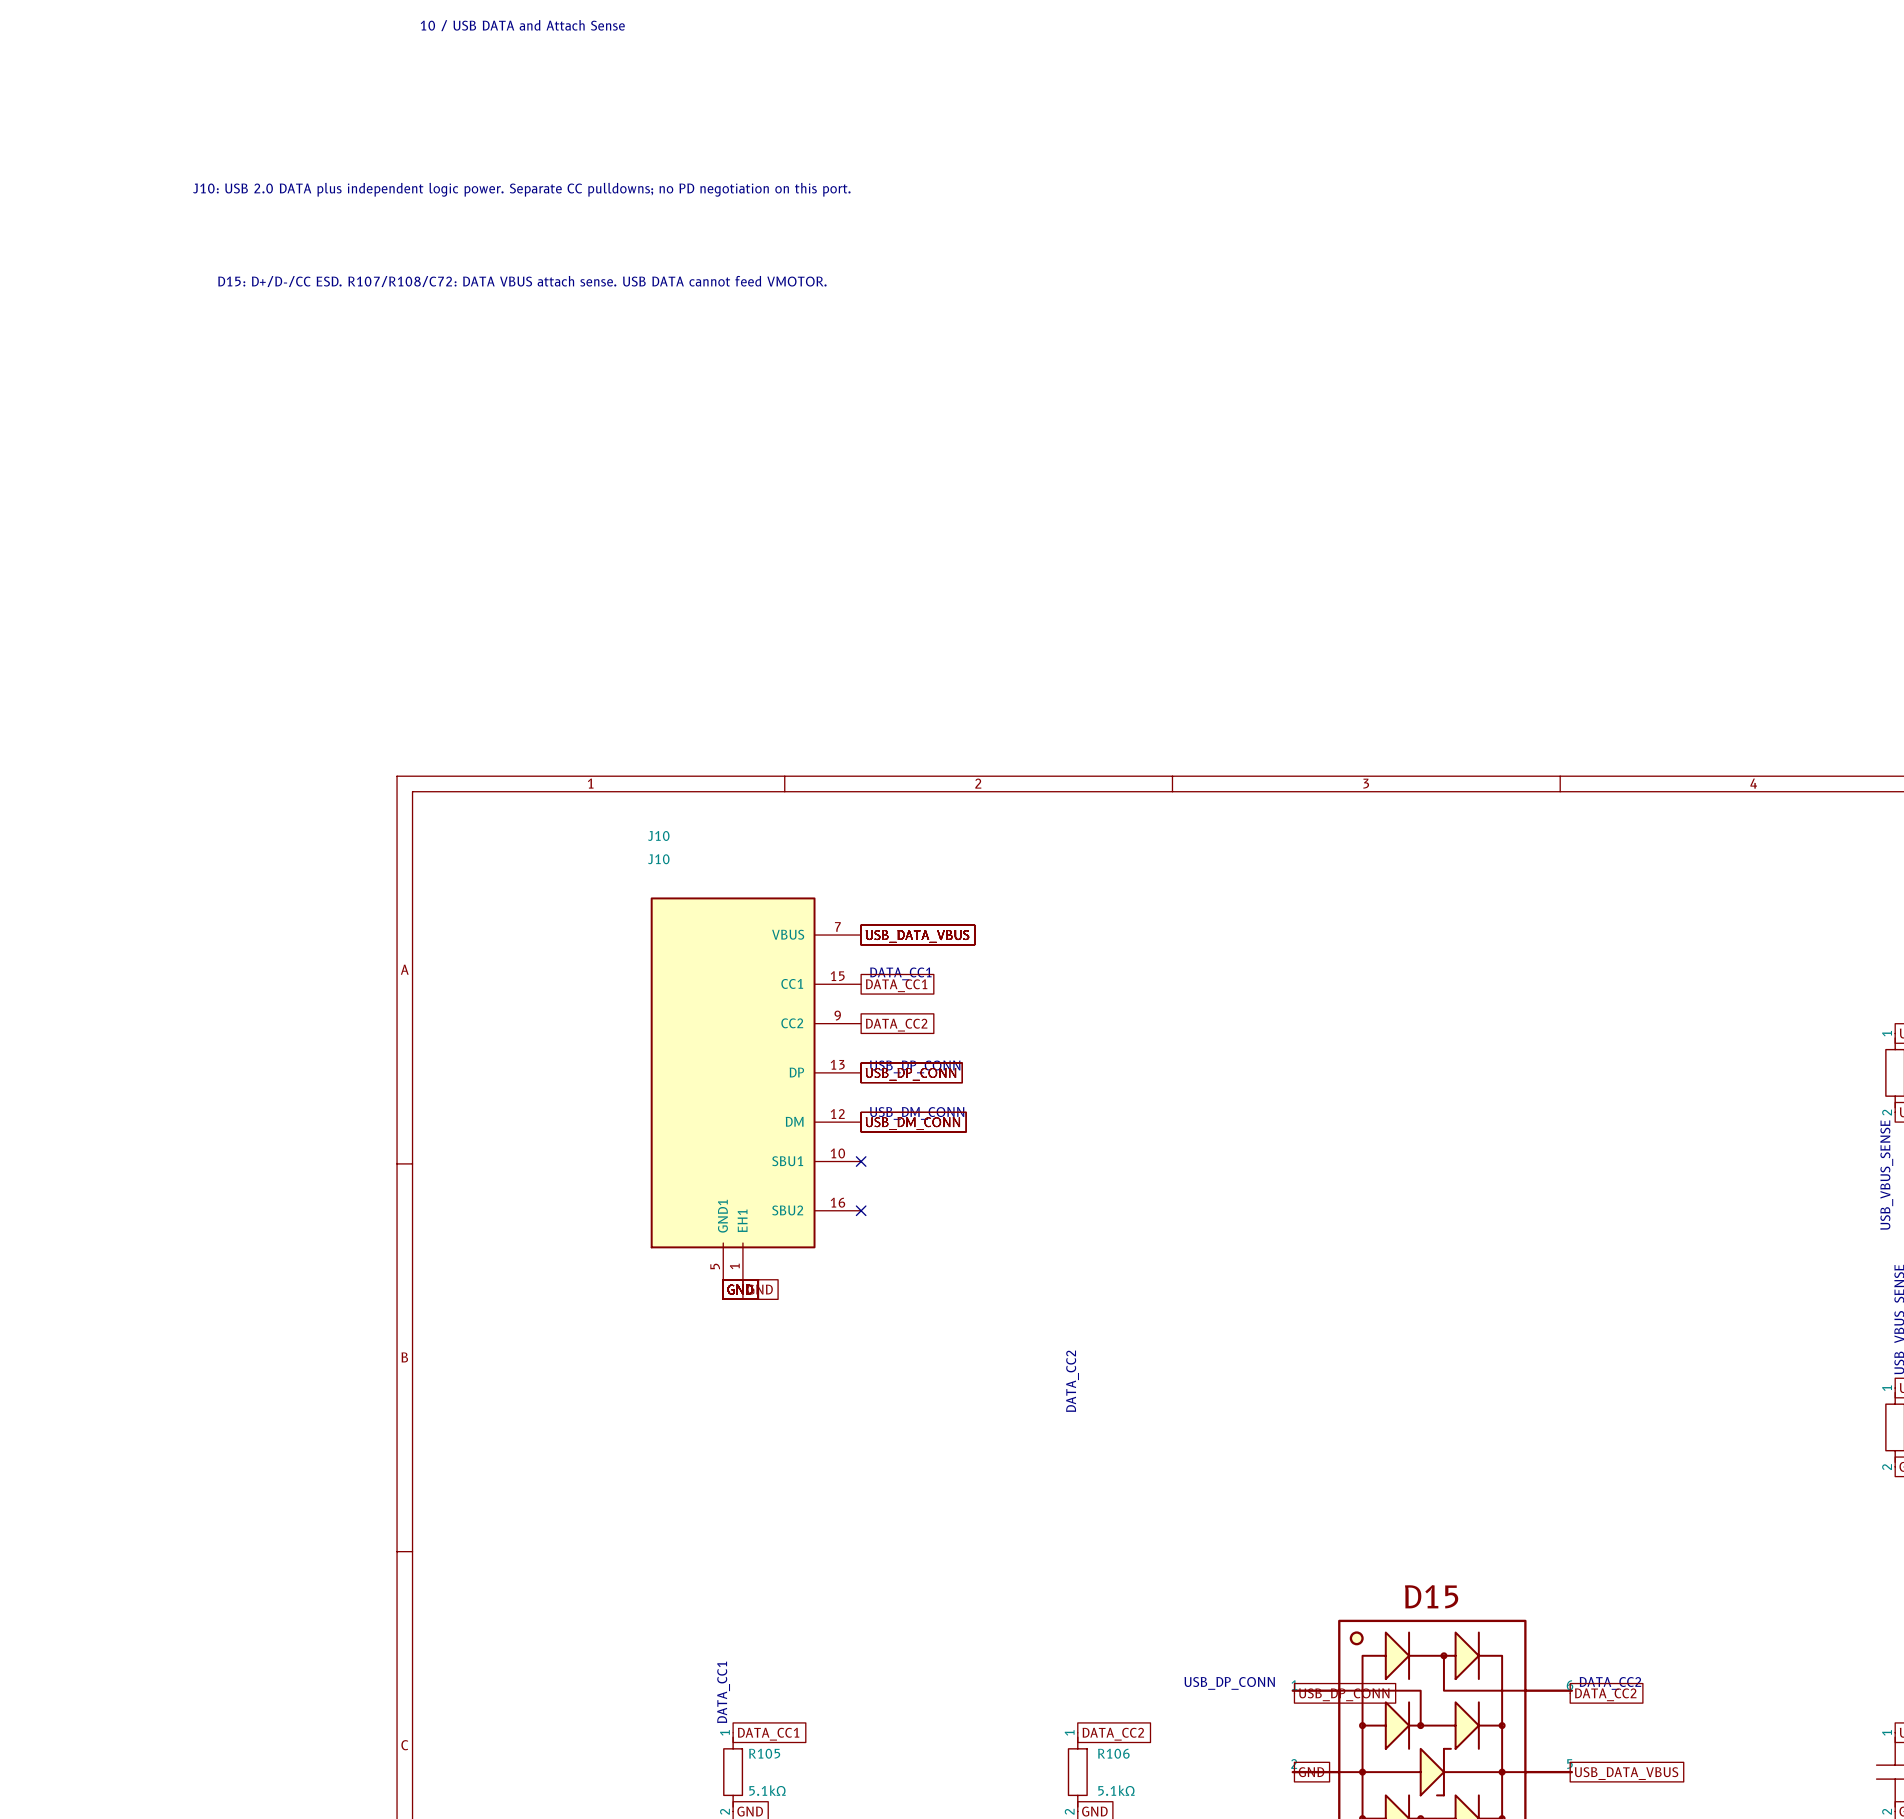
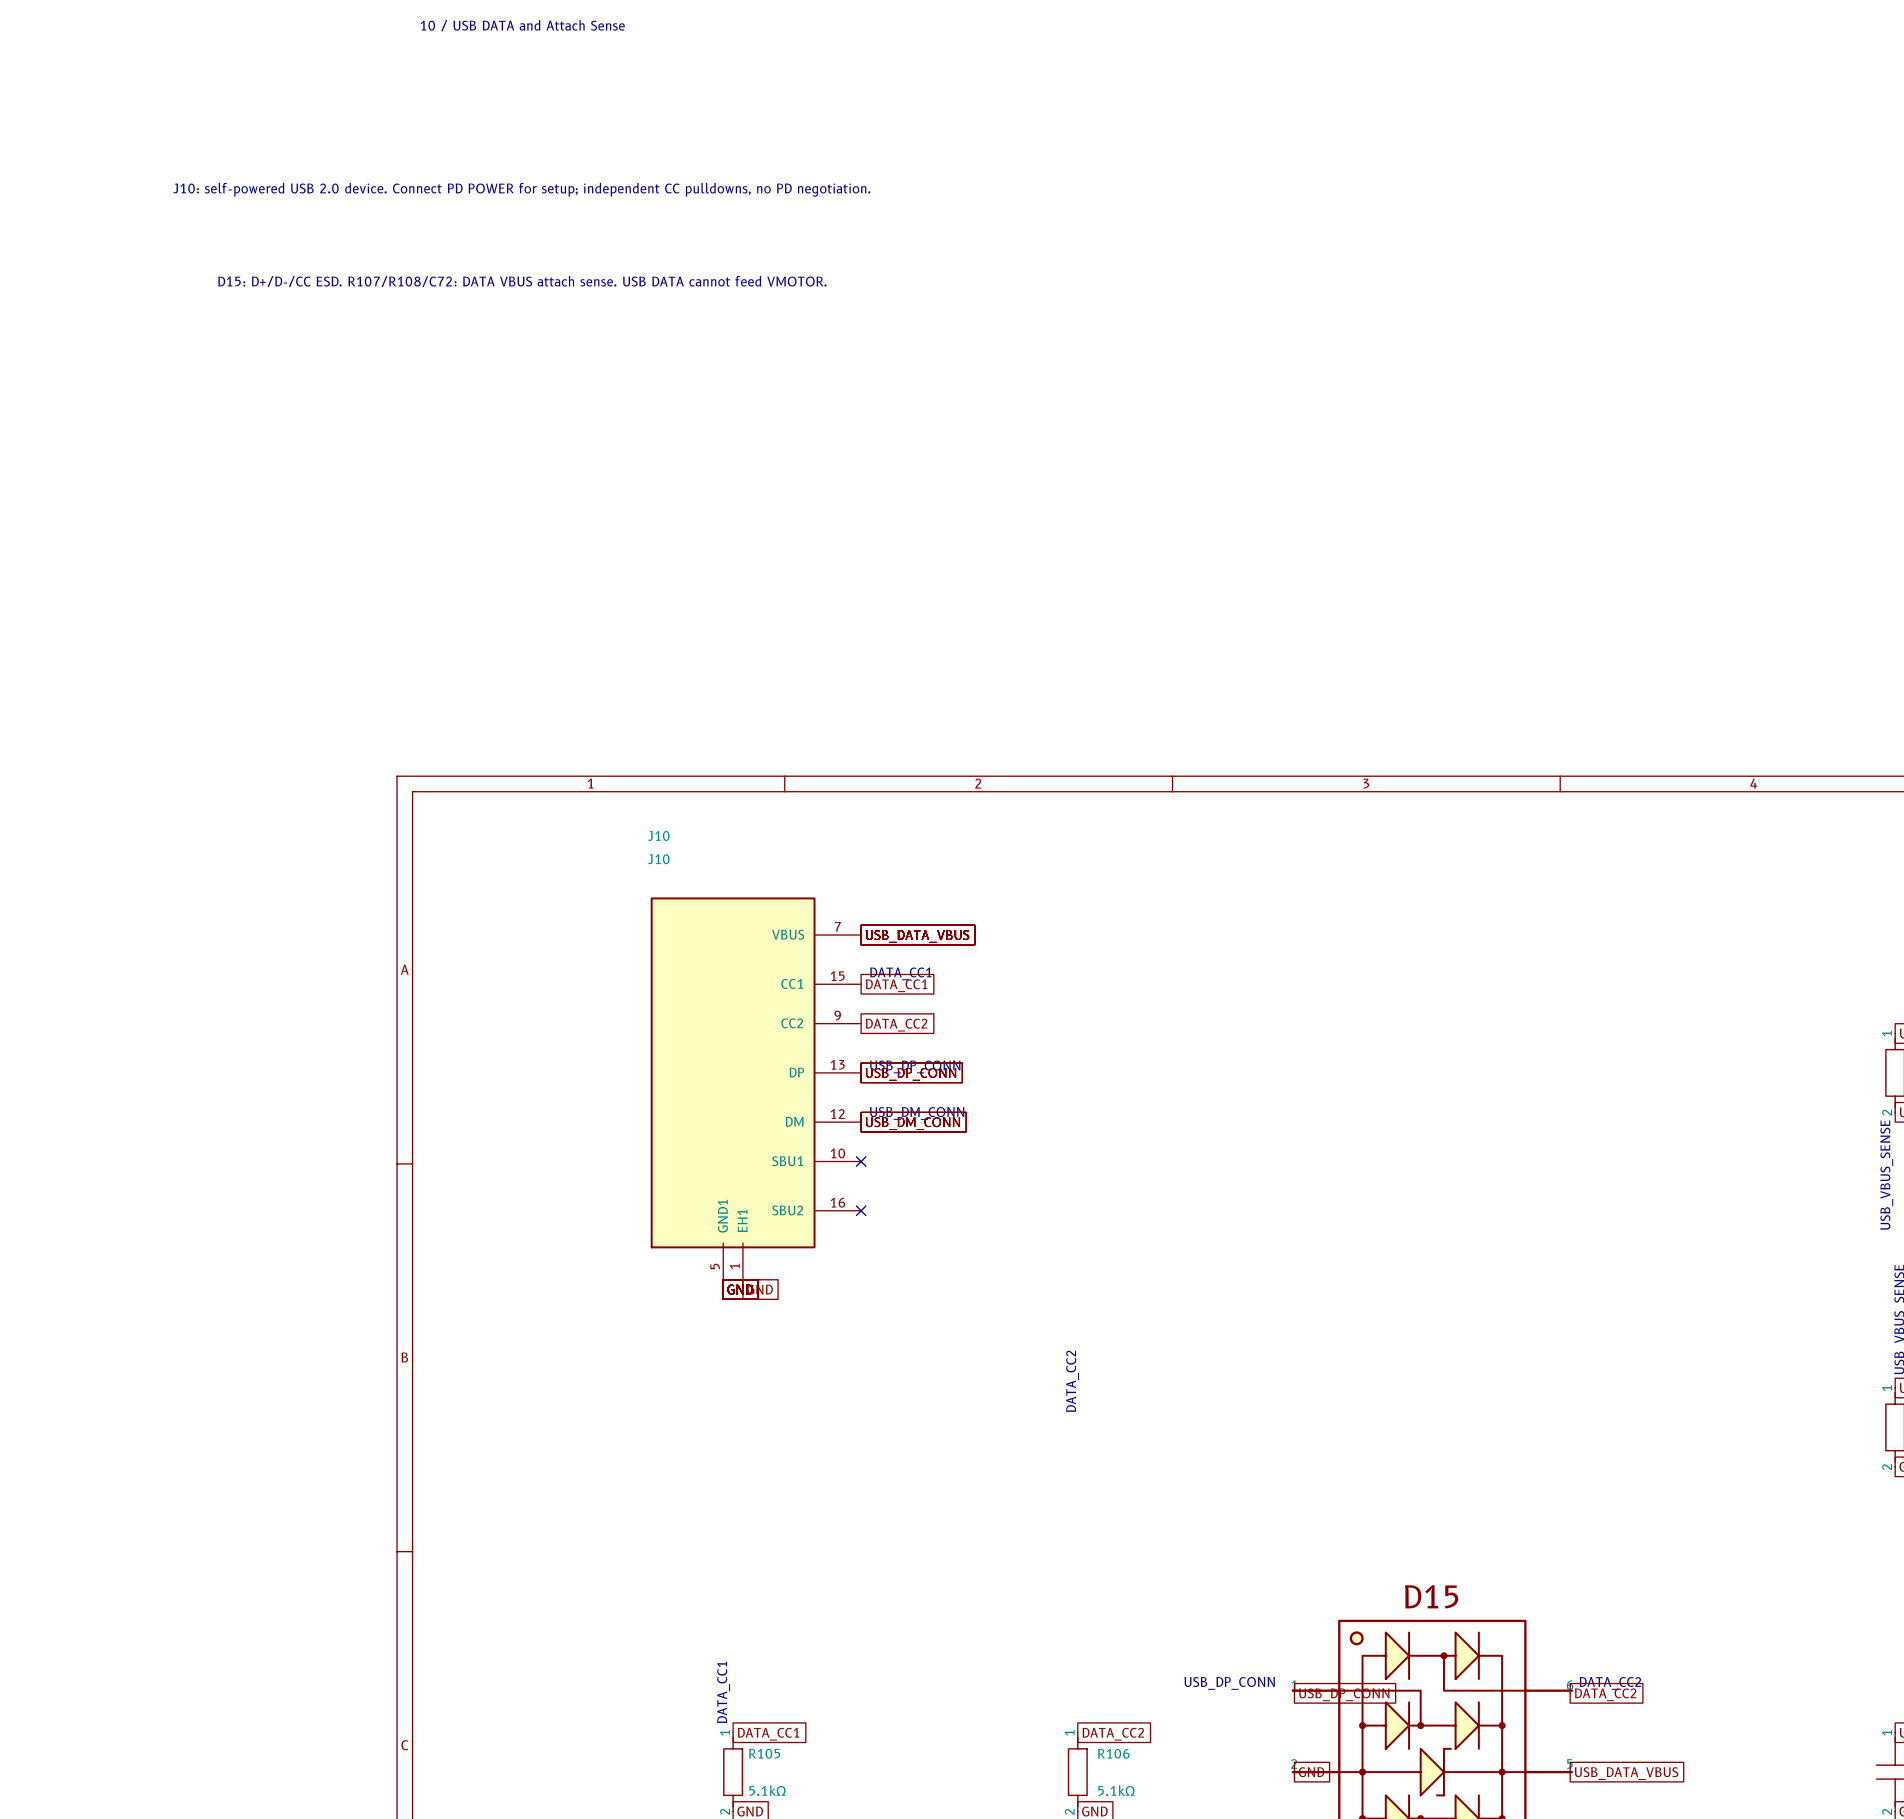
text: J10: USB 2.0 DATA plus independent logic power. Separate CC pulldowns; no PD negotiation on this port. (521, 189) -> J10: self-powered USB 2.0 device. Connect PD POWER for setup; independent CC pulldowns, no PD negotiation. (521, 189)

